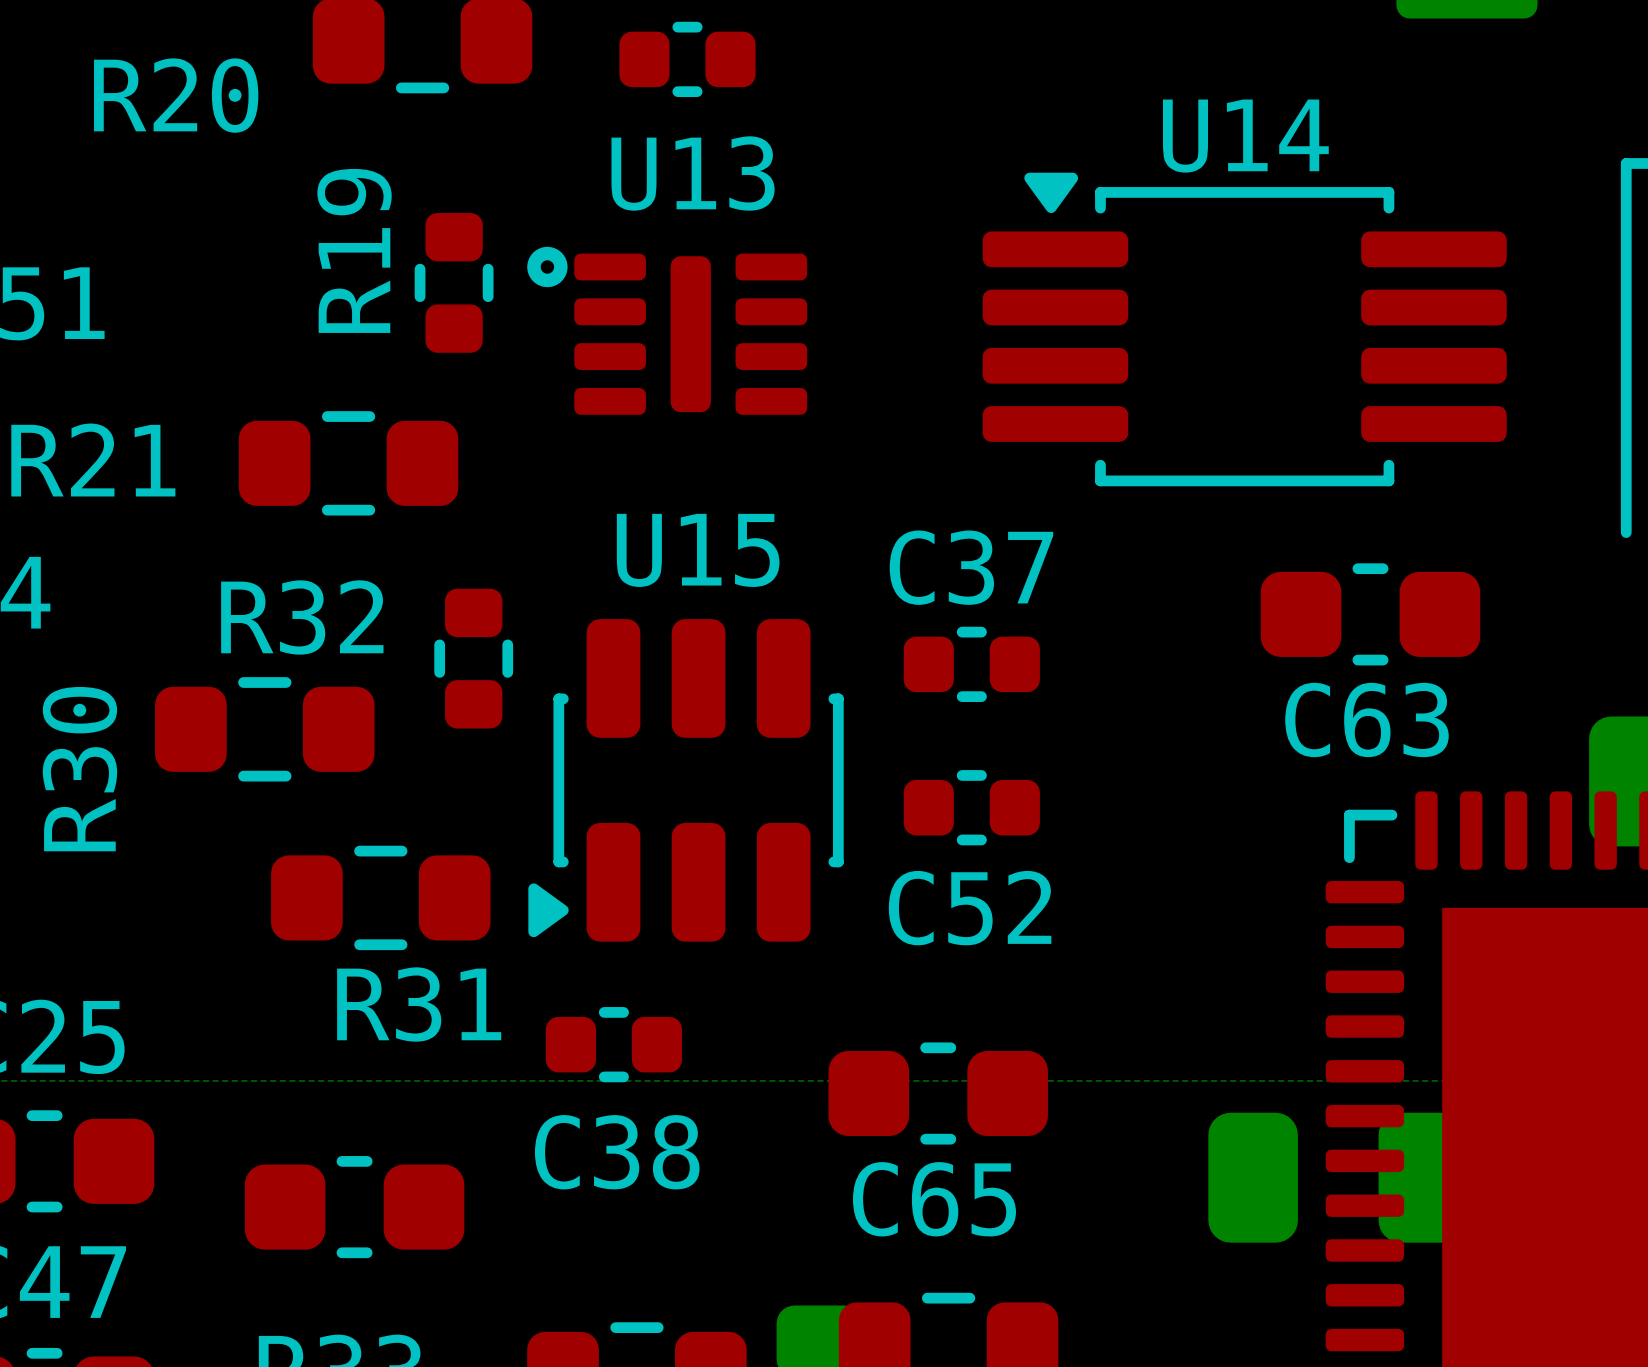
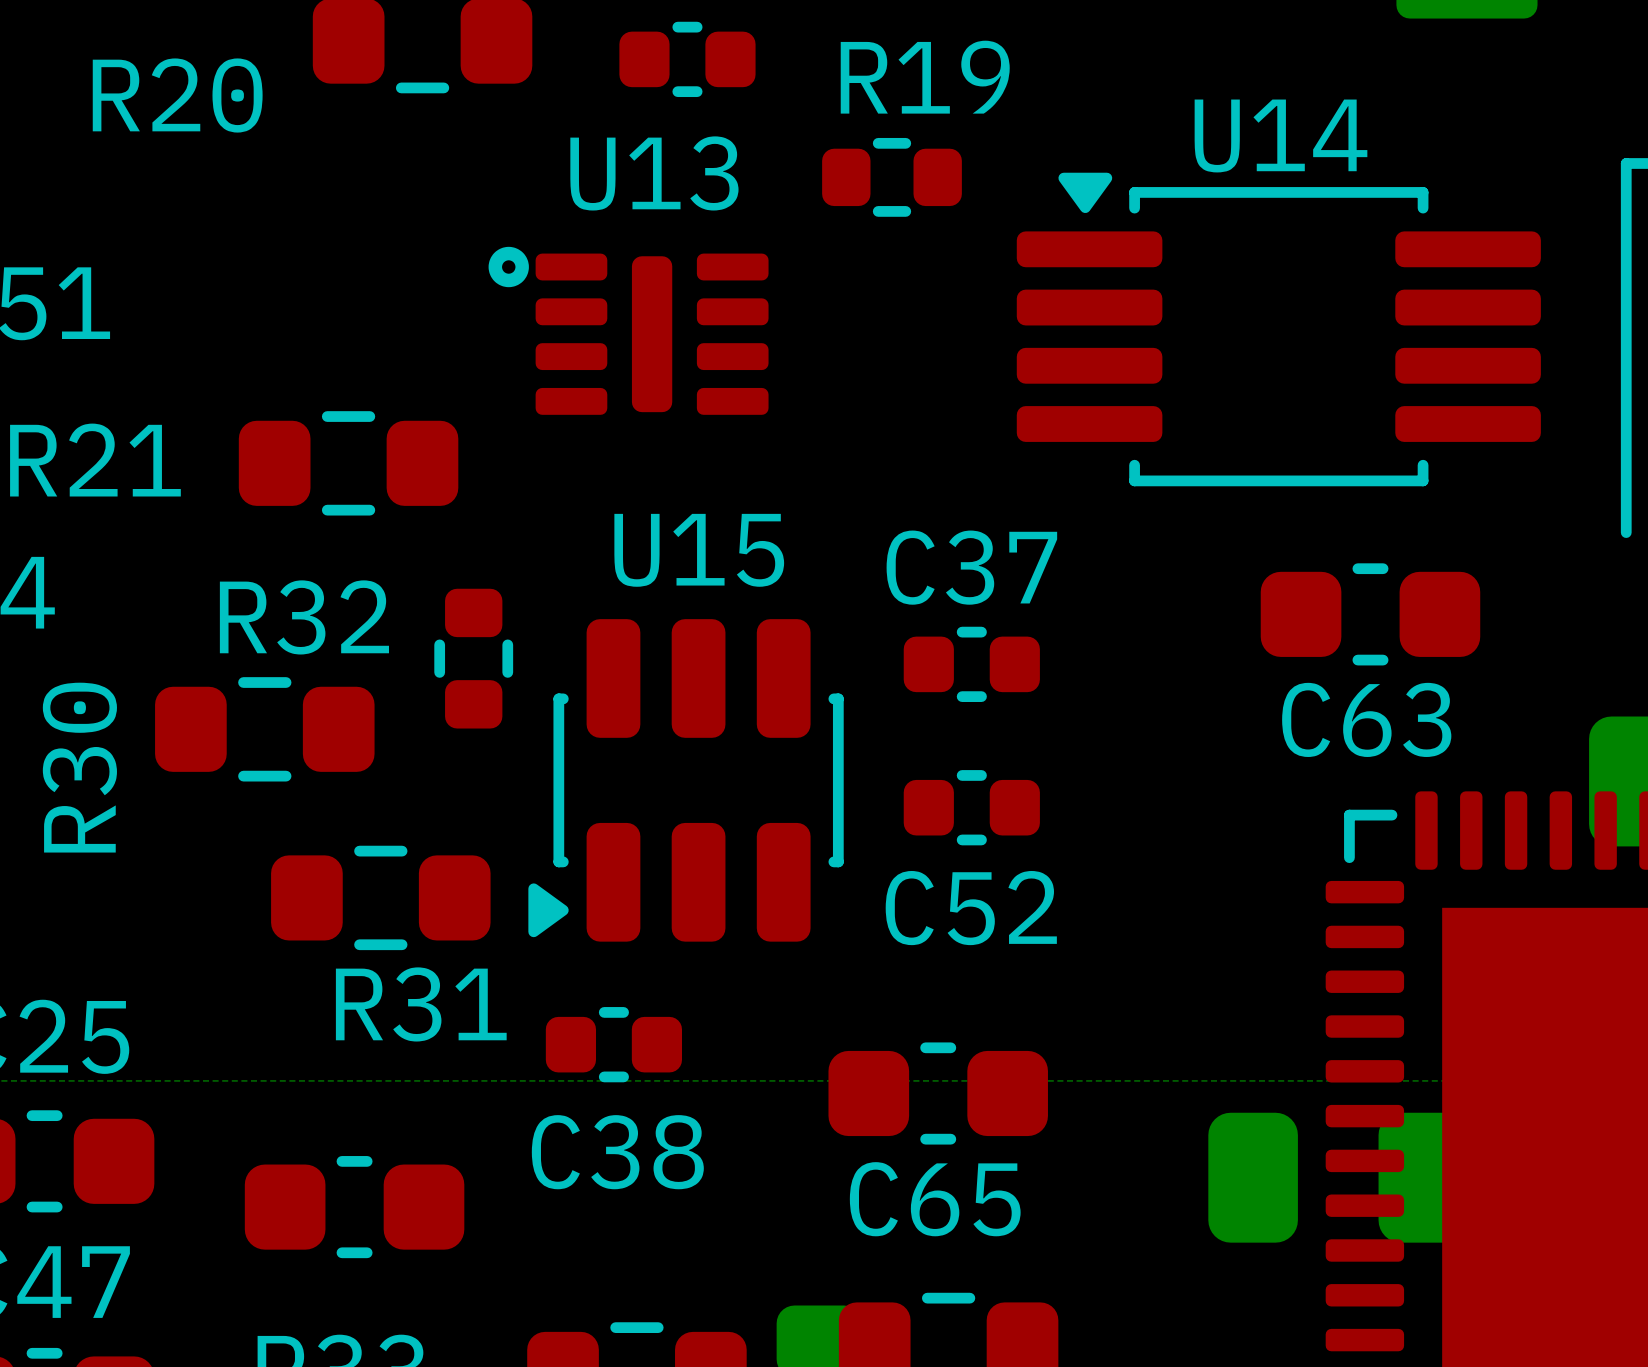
R19 rotation: 0° (454, 282) -> 90° clockwise (892, 177)
R19 position: (454, 282) -> (892, 177)
U14 position: (1244, 329) -> (1278, 329)
U13 position: (667, 330) -> (628, 330)

